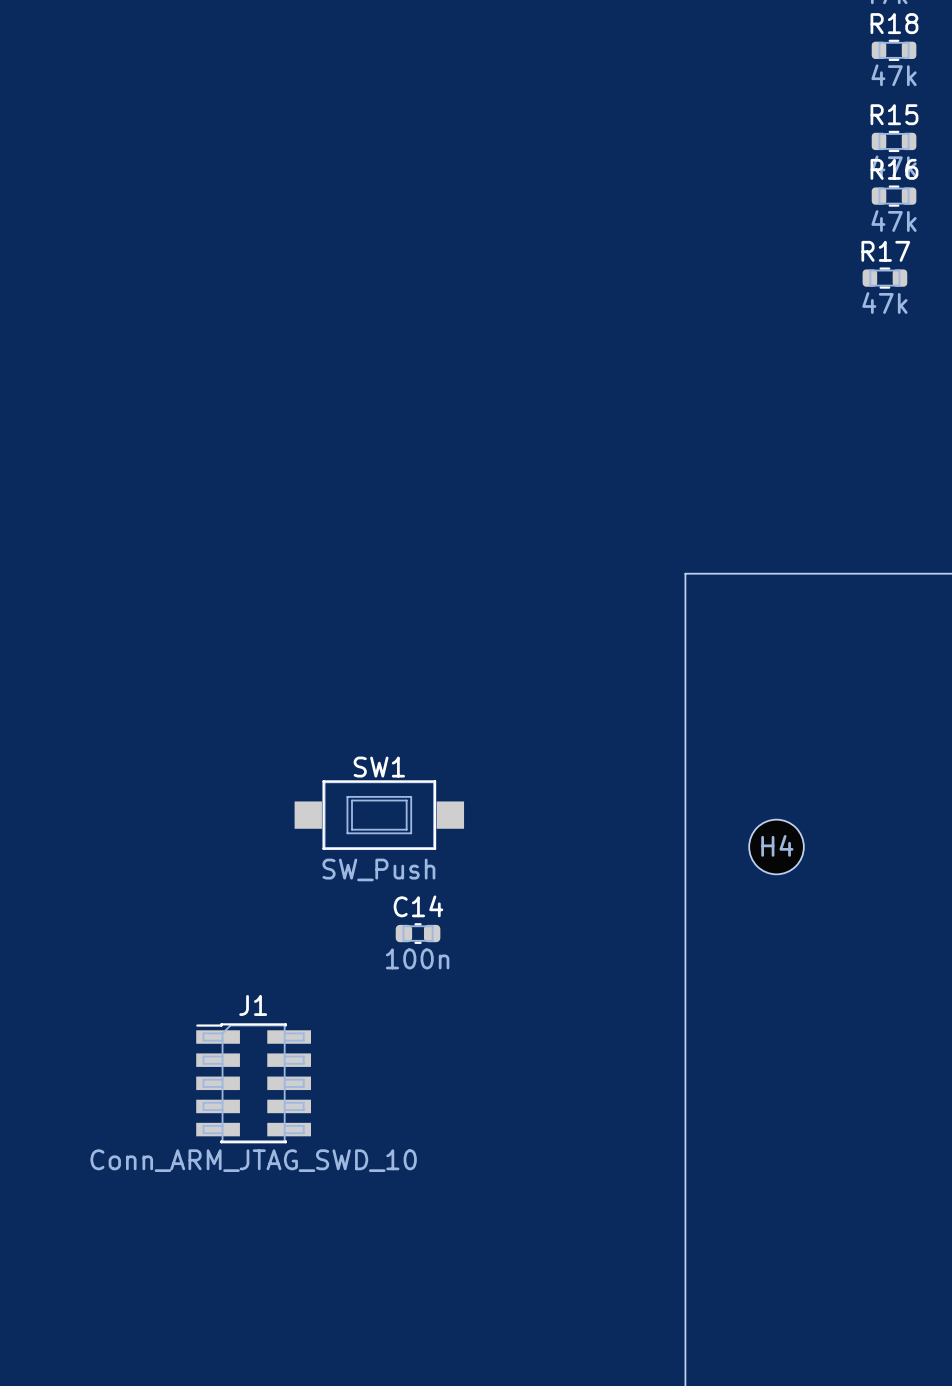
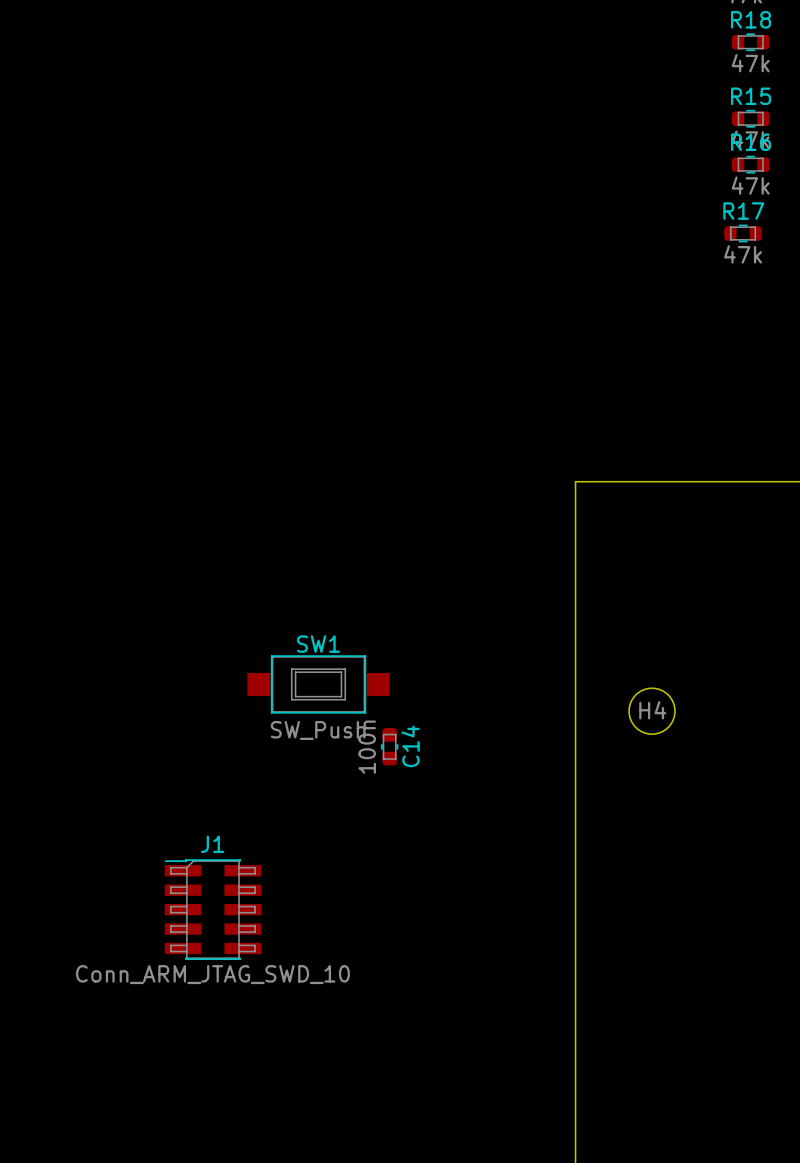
C14 rotation: 0° (418, 933) -> 90° clockwise (389, 746)
C14 position: (418, 933) -> (389, 746)

